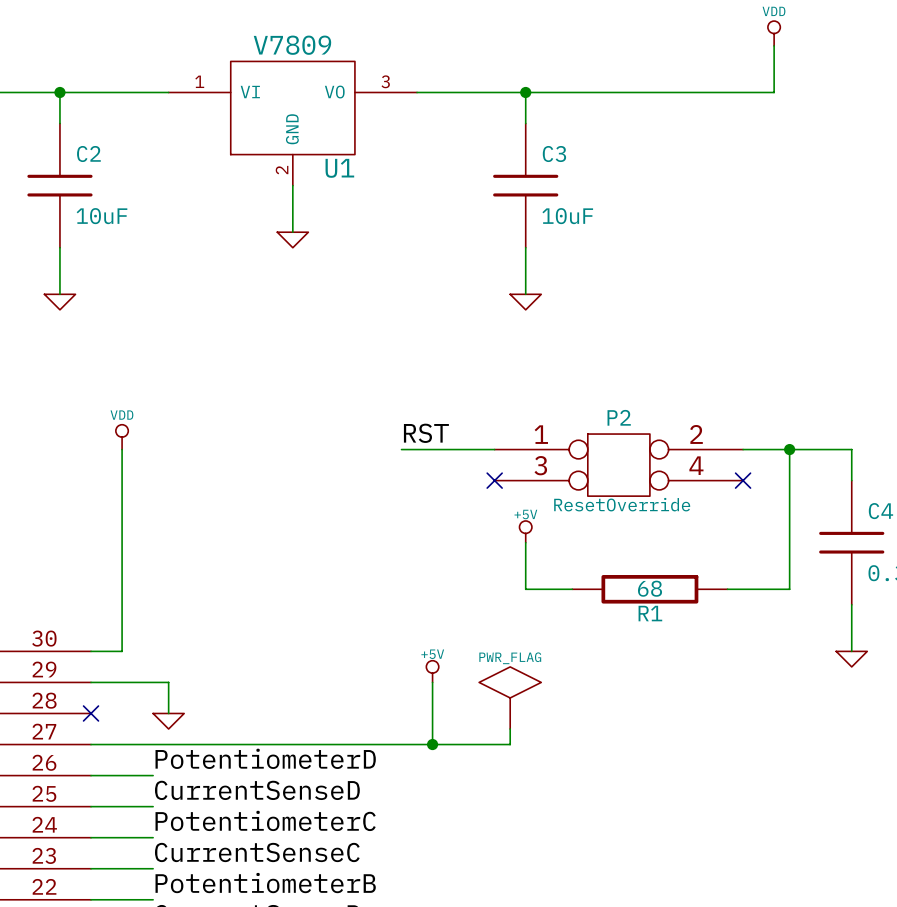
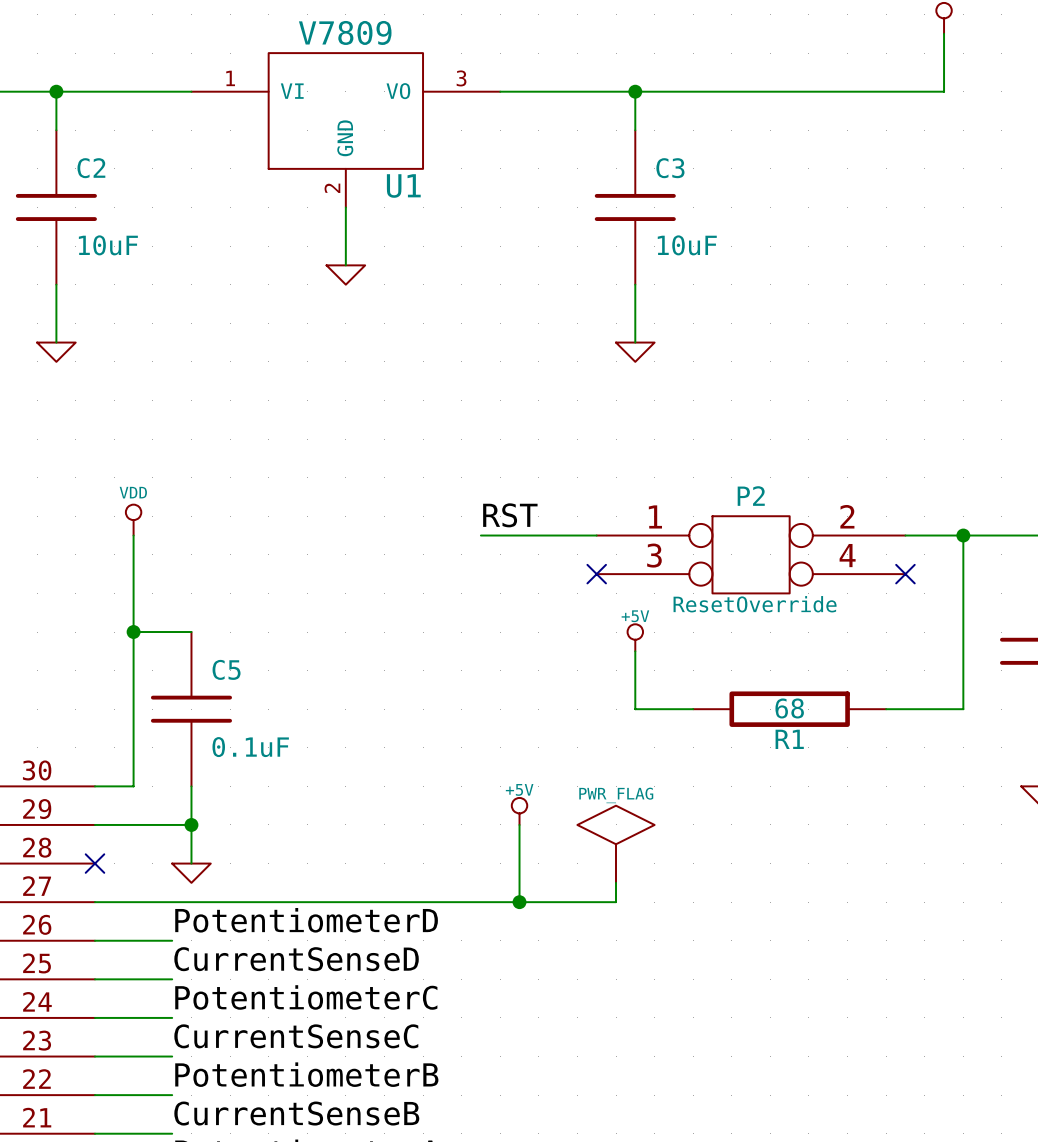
wire: none -> (133, 632) (191, 632)
junction: none -> (133, 632)
C5: none -> 0.1uF (191, 709)
wire: none -> (191, 786) (191, 824)
junction: none -> (191, 824)

